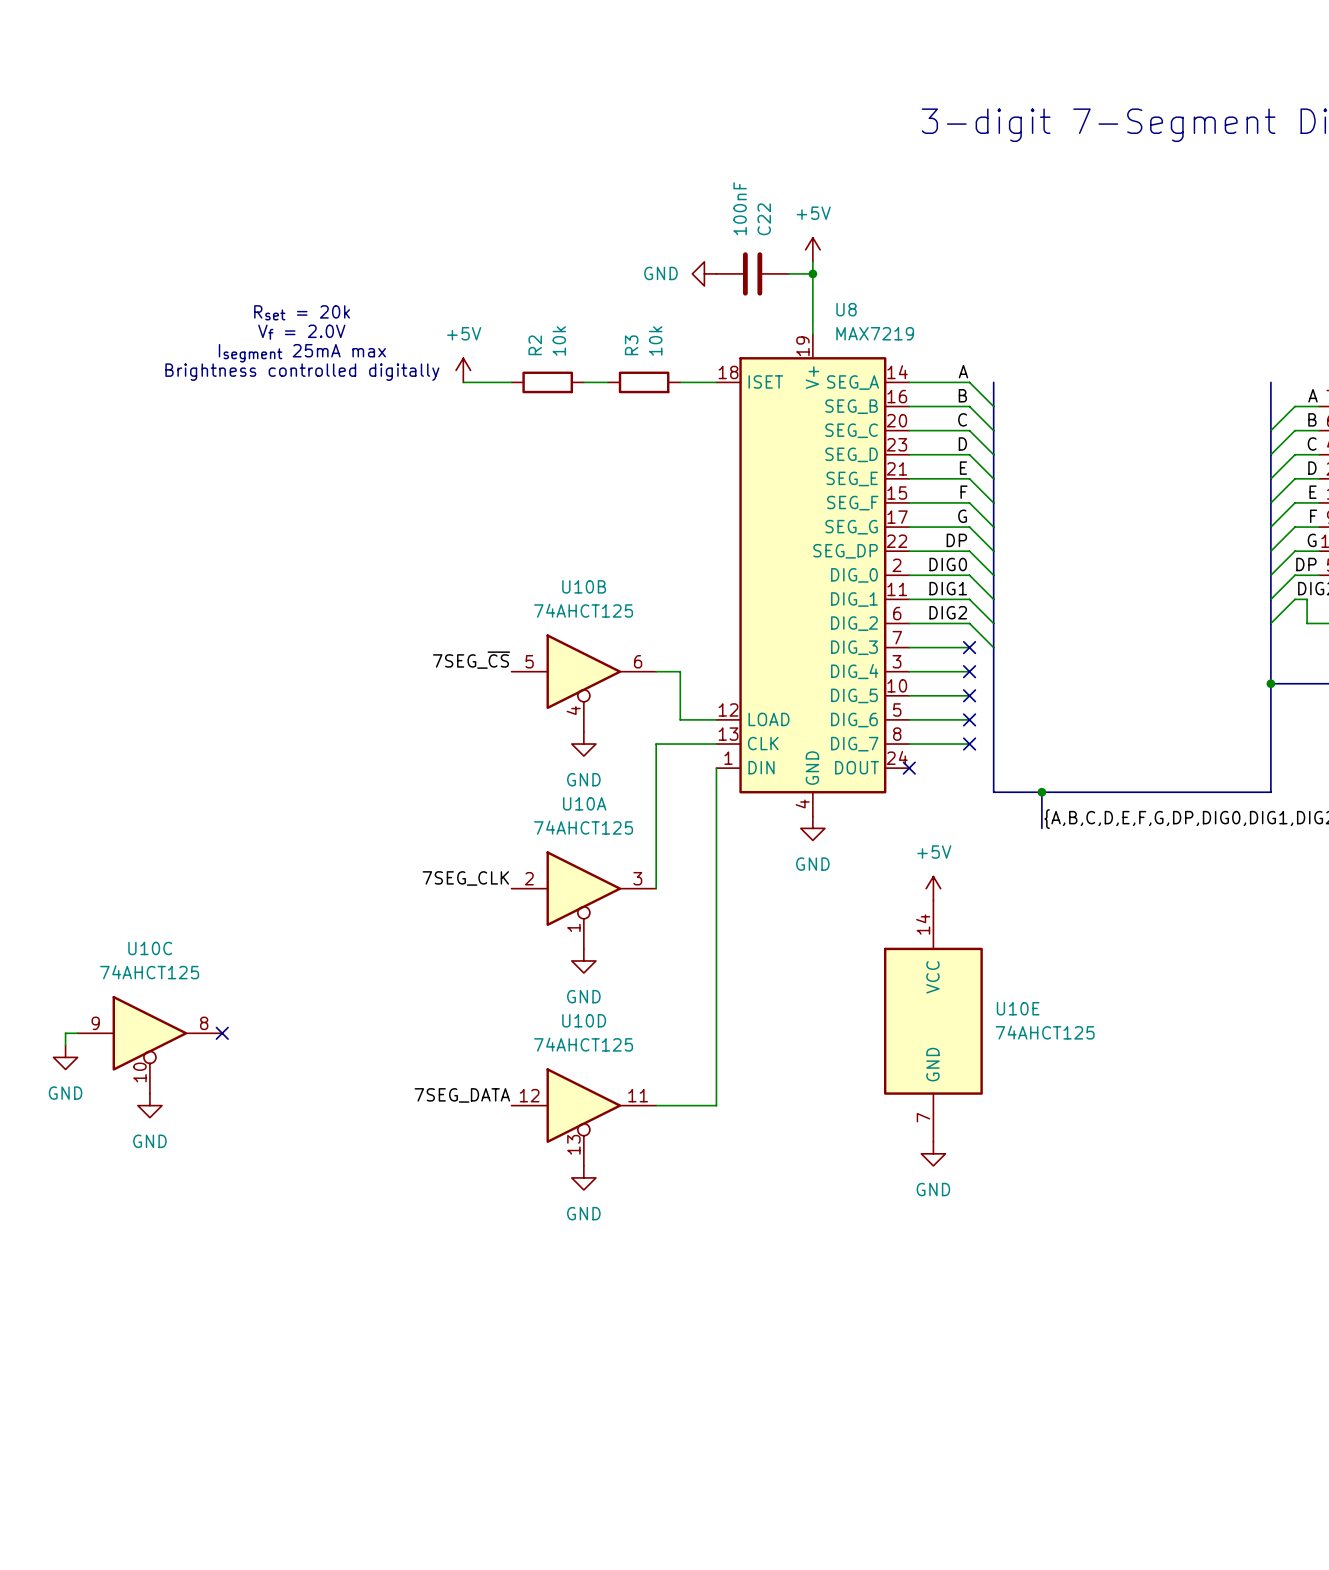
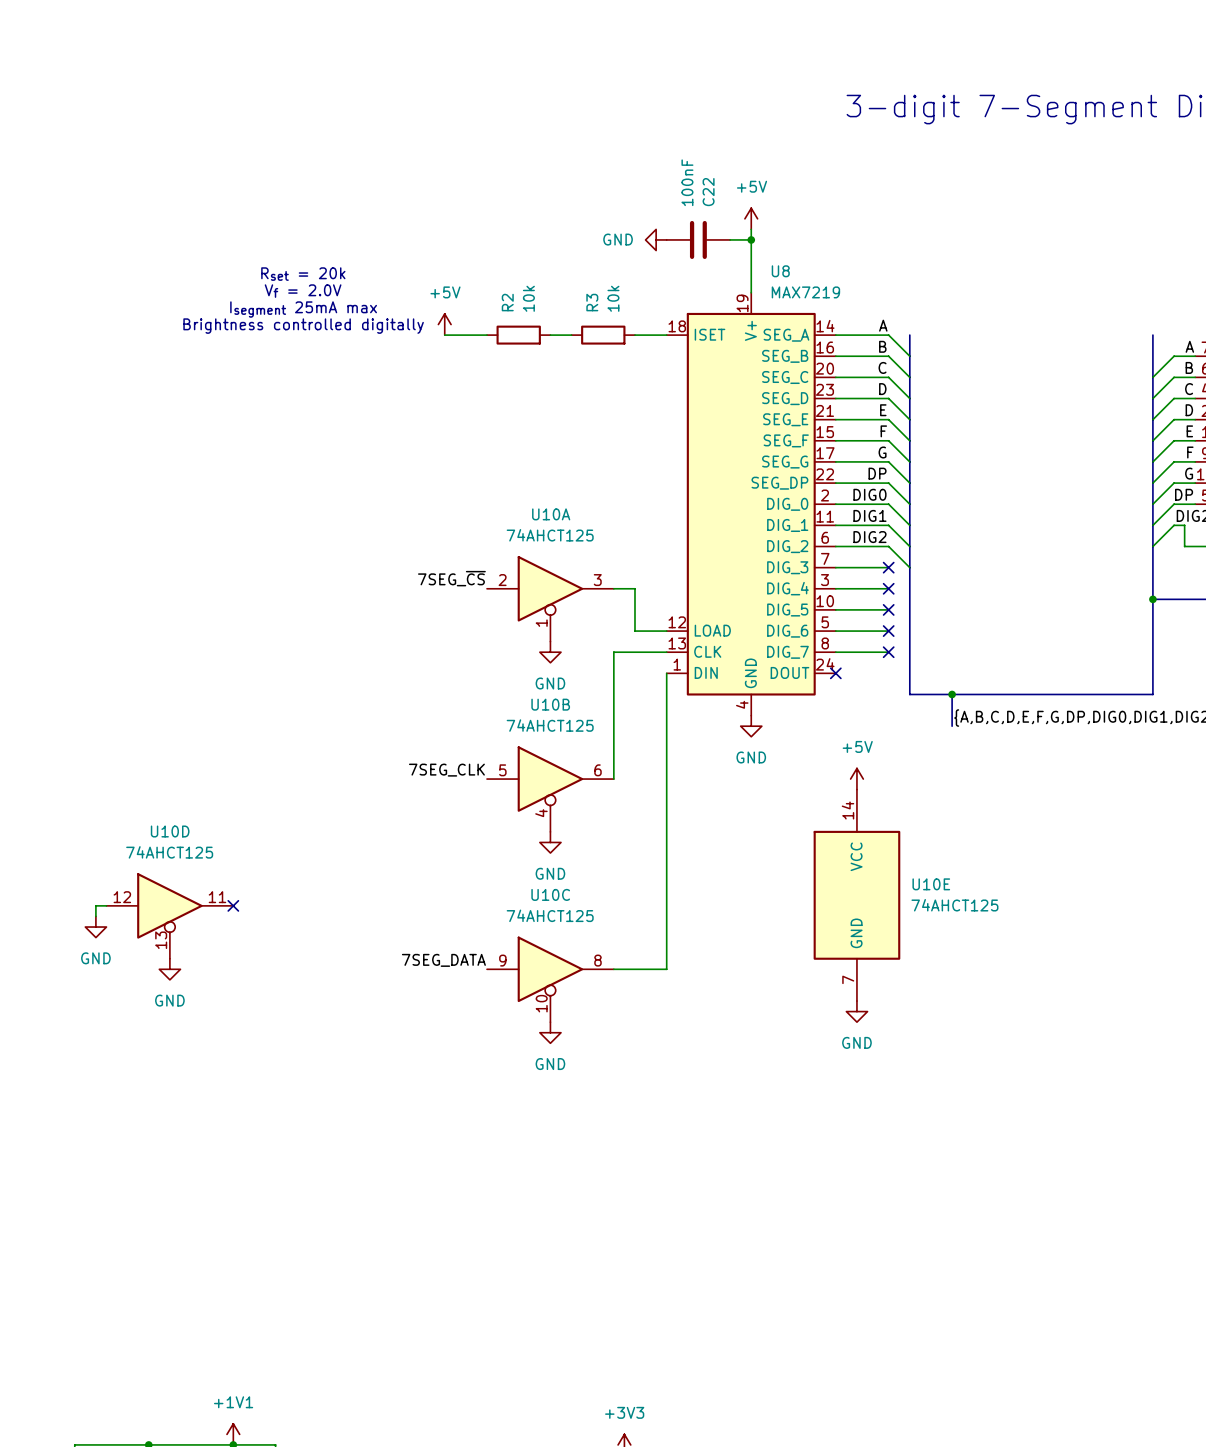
U10B position: (583, 683) -> (550, 789)
U10A position: (583, 900) -> (550, 598)
U10C position: (149, 1044) -> (550, 979)
U10D position: (583, 1117) -> (169, 915)

